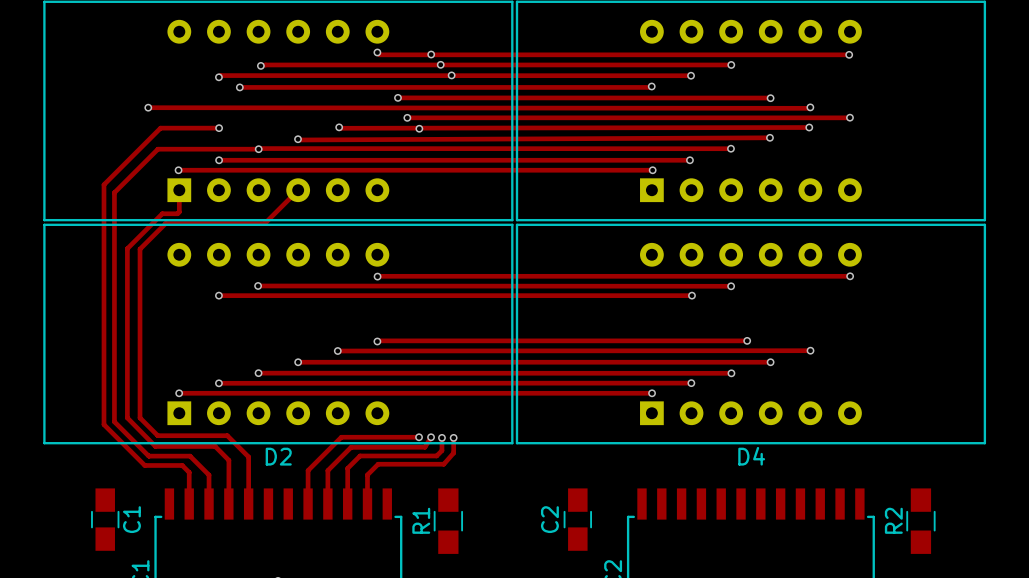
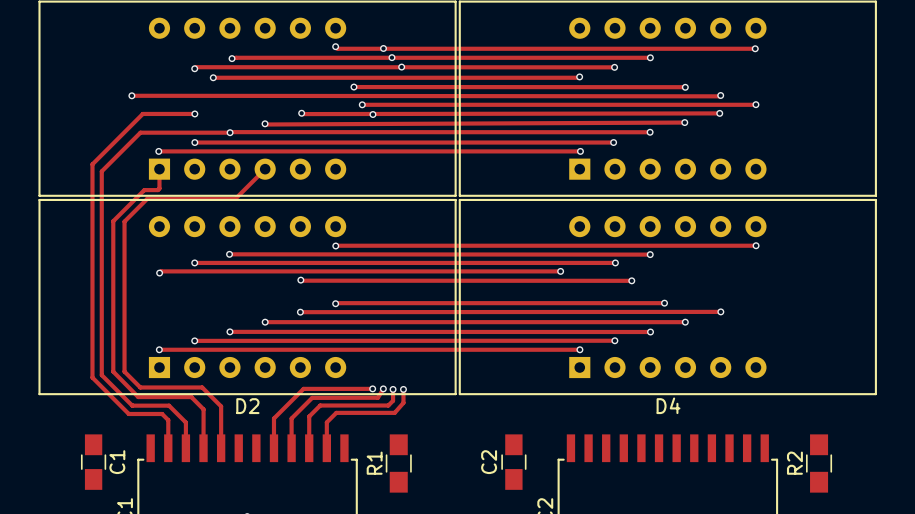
track: none -> (560, 271) (161, 271) (159, 273)
via: none -> (560, 271)
via: none -> (159, 273)
track: none -> (300, 280) (631, 280)
via: none -> (300, 280)
via: none -> (631, 280)

